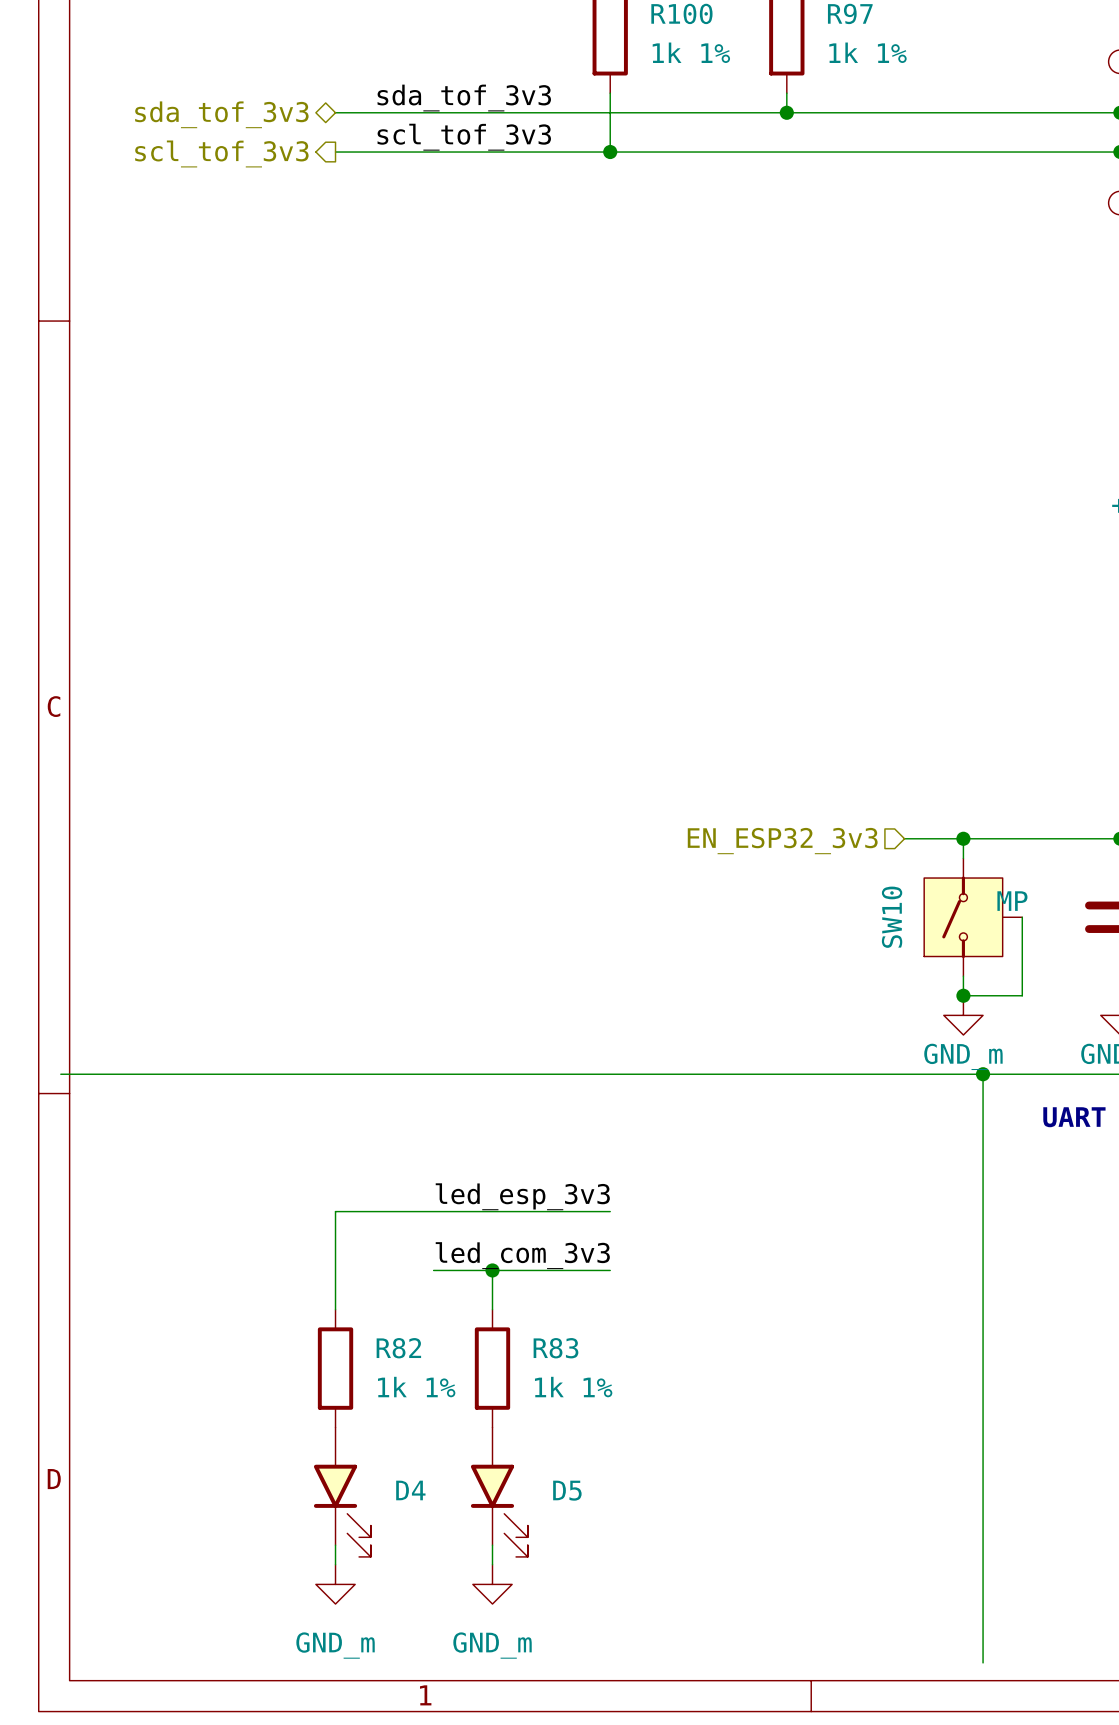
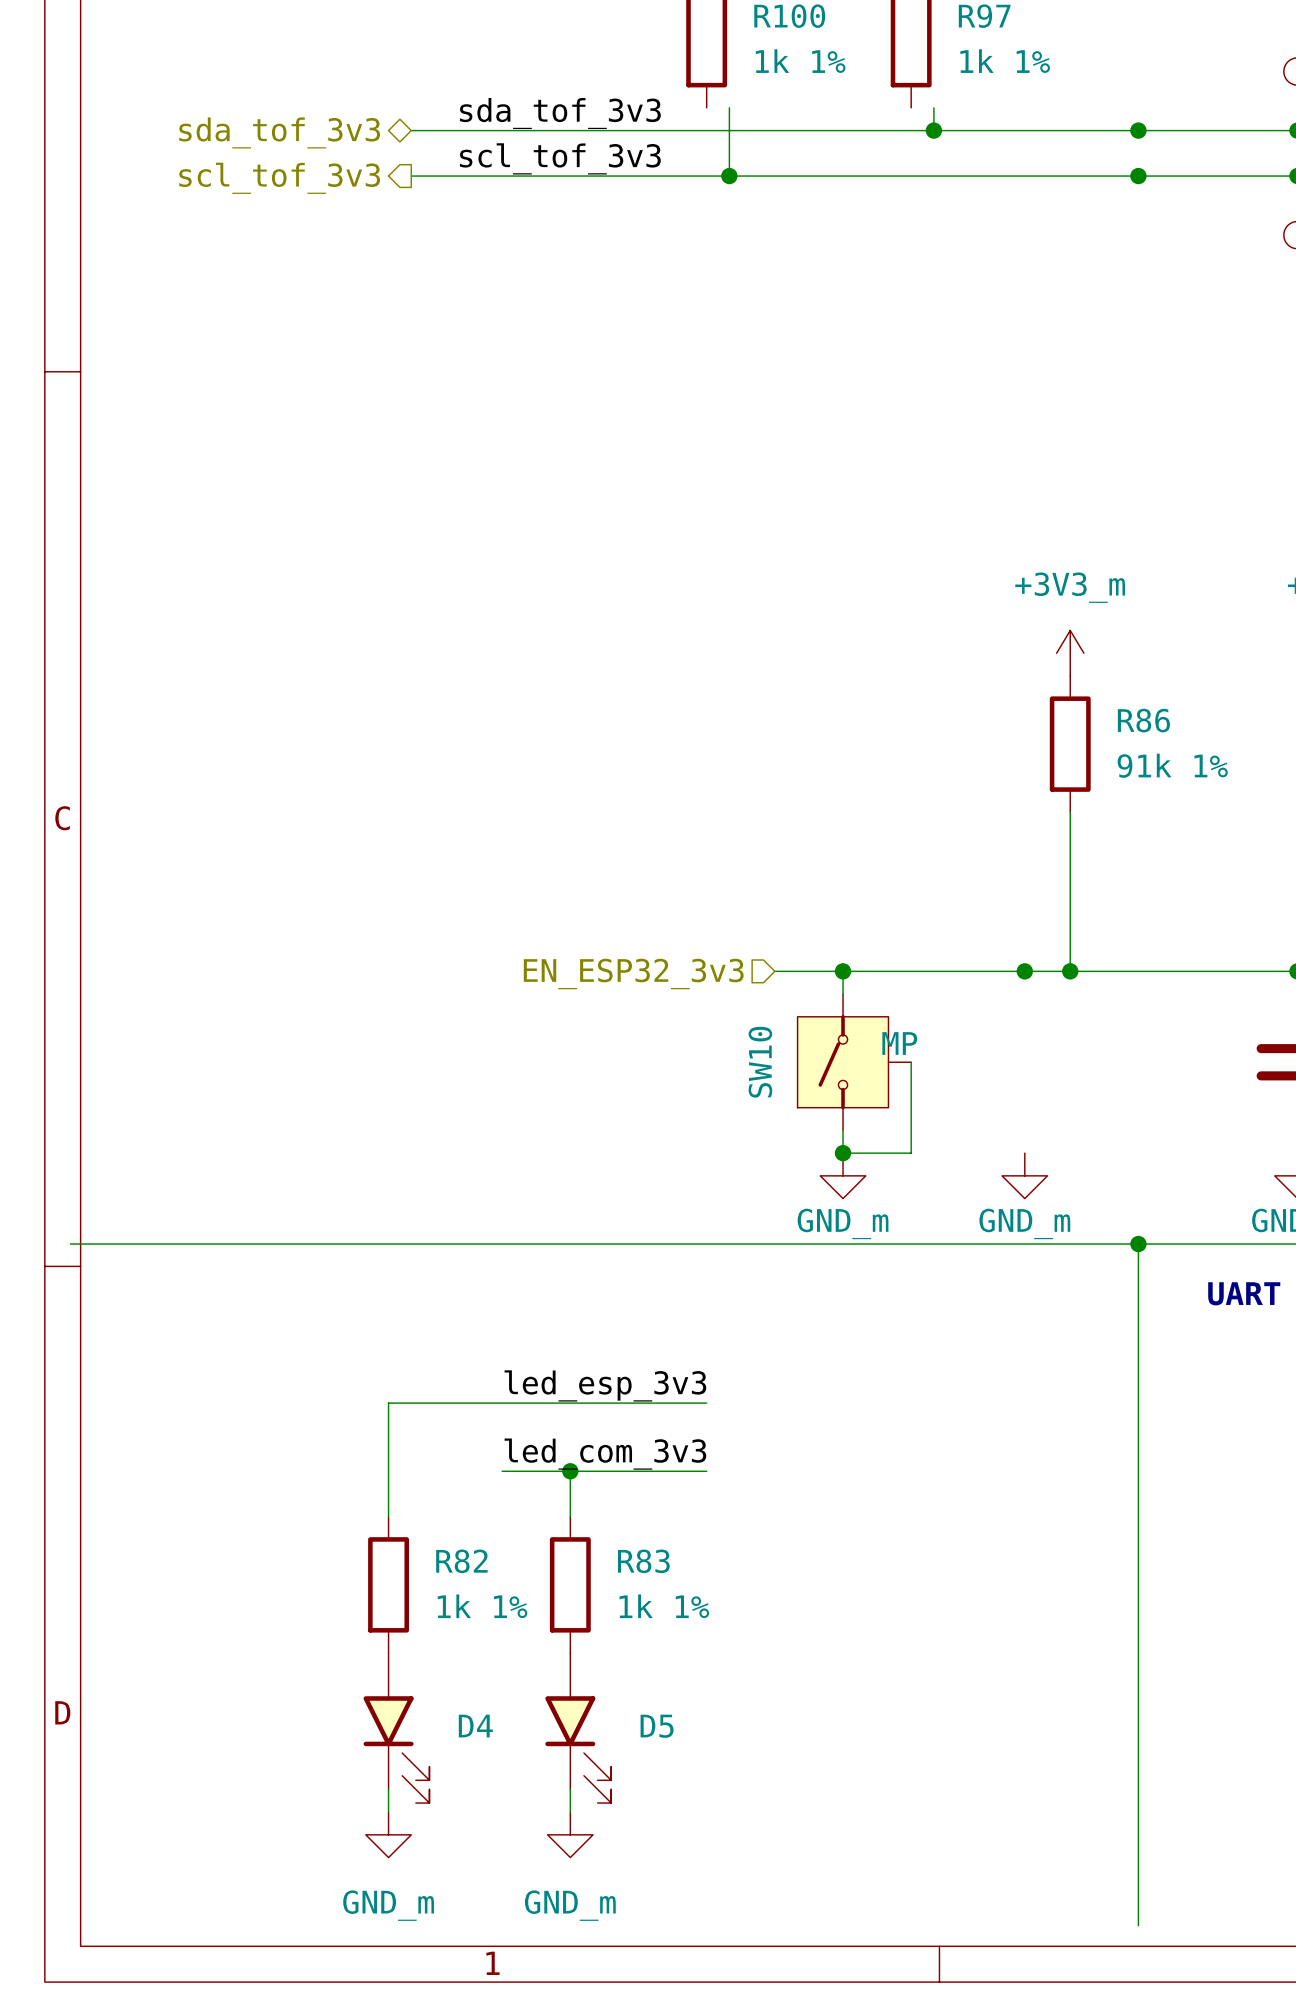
wire: (610, 93) (610, 152) -> (729, 107) (729, 176)
wire: (786, 93) (786, 112) -> (933, 107) (933, 130)
label position: sda_tof_3v3 (464, 98) -> sda_tof_3v3 (560, 113)
wire: (335, 112) (355, 112) -> none
junction position: (786, 112) -> (933, 130)
junction: none -> (1138, 130)
hierarchical label position: sda_tof_3v3 (221, 114) -> sda_tof_3v3 (279, 132)
label position: scl_tof_3v3 (464, 137) -> scl_tof_3v3 (560, 158)
wire: (335, 152) (355, 152) -> none
junction position: (610, 152) -> (729, 176)
junction: none -> (1138, 176)
hierarchical label position: scl_tof_3v3 (221, 153) -> scl_tof_3v3 (279, 178)
power symbol: none -> +3V3_m (1070, 653)
R86: none -> 91k 1% (1070, 744)
wire: none -> (1070, 812) (1070, 971)
wire: none -> (774, 971) (1047, 971)
junction: none -> (843, 971)
junction: none -> (1024, 971)
junction: none -> (1070, 971)
wire: (963, 838) (963, 858) -> (843, 971) (843, 994)
junction: (963, 838) -> none
hierarchical label position: EN_ESP32_3v3 (782, 841) -> EN_ESP32_3v3 (633, 973)
SW10 position: (973, 917) -> (854, 1062)
wire: (1022, 917) (1022, 995) (963, 995) (963, 976) -> (911, 1062) (911, 1153) (843, 1153) (843, 1130)
junction: none -> (843, 1153)
junction: (963, 995) -> none
power symbol: none -> GND_m (843, 1175)
power symbol position: GND_m (963, 1015) -> GND_m (1024, 1175)

